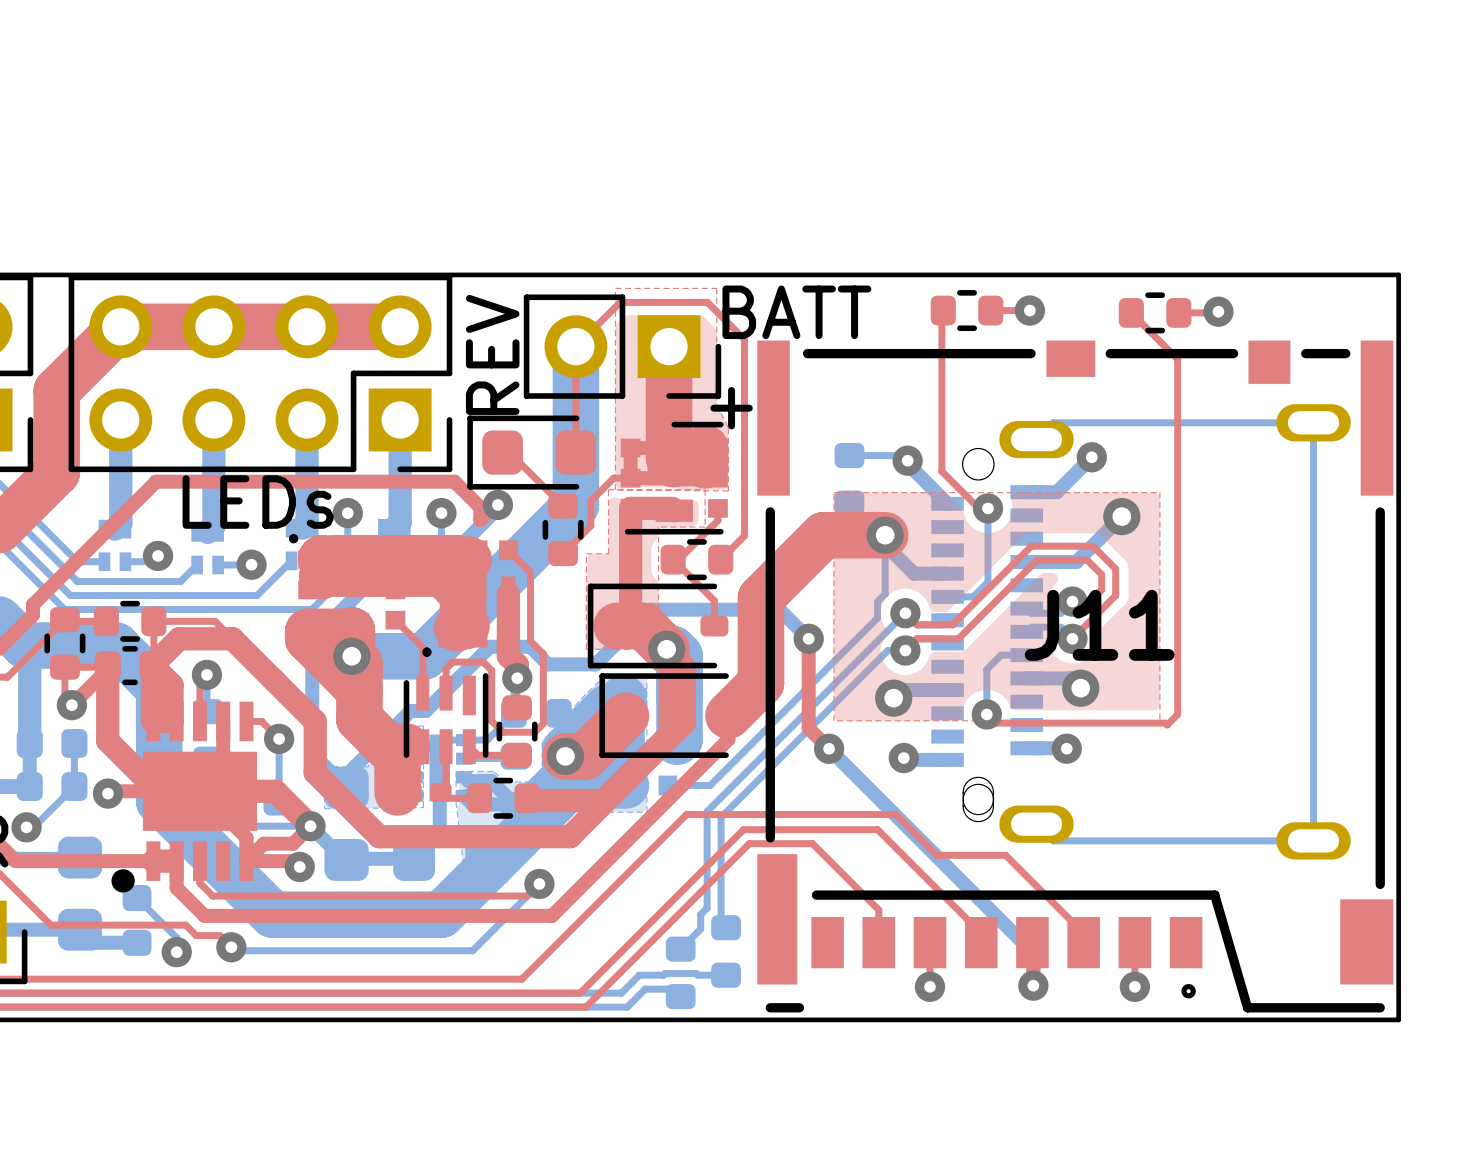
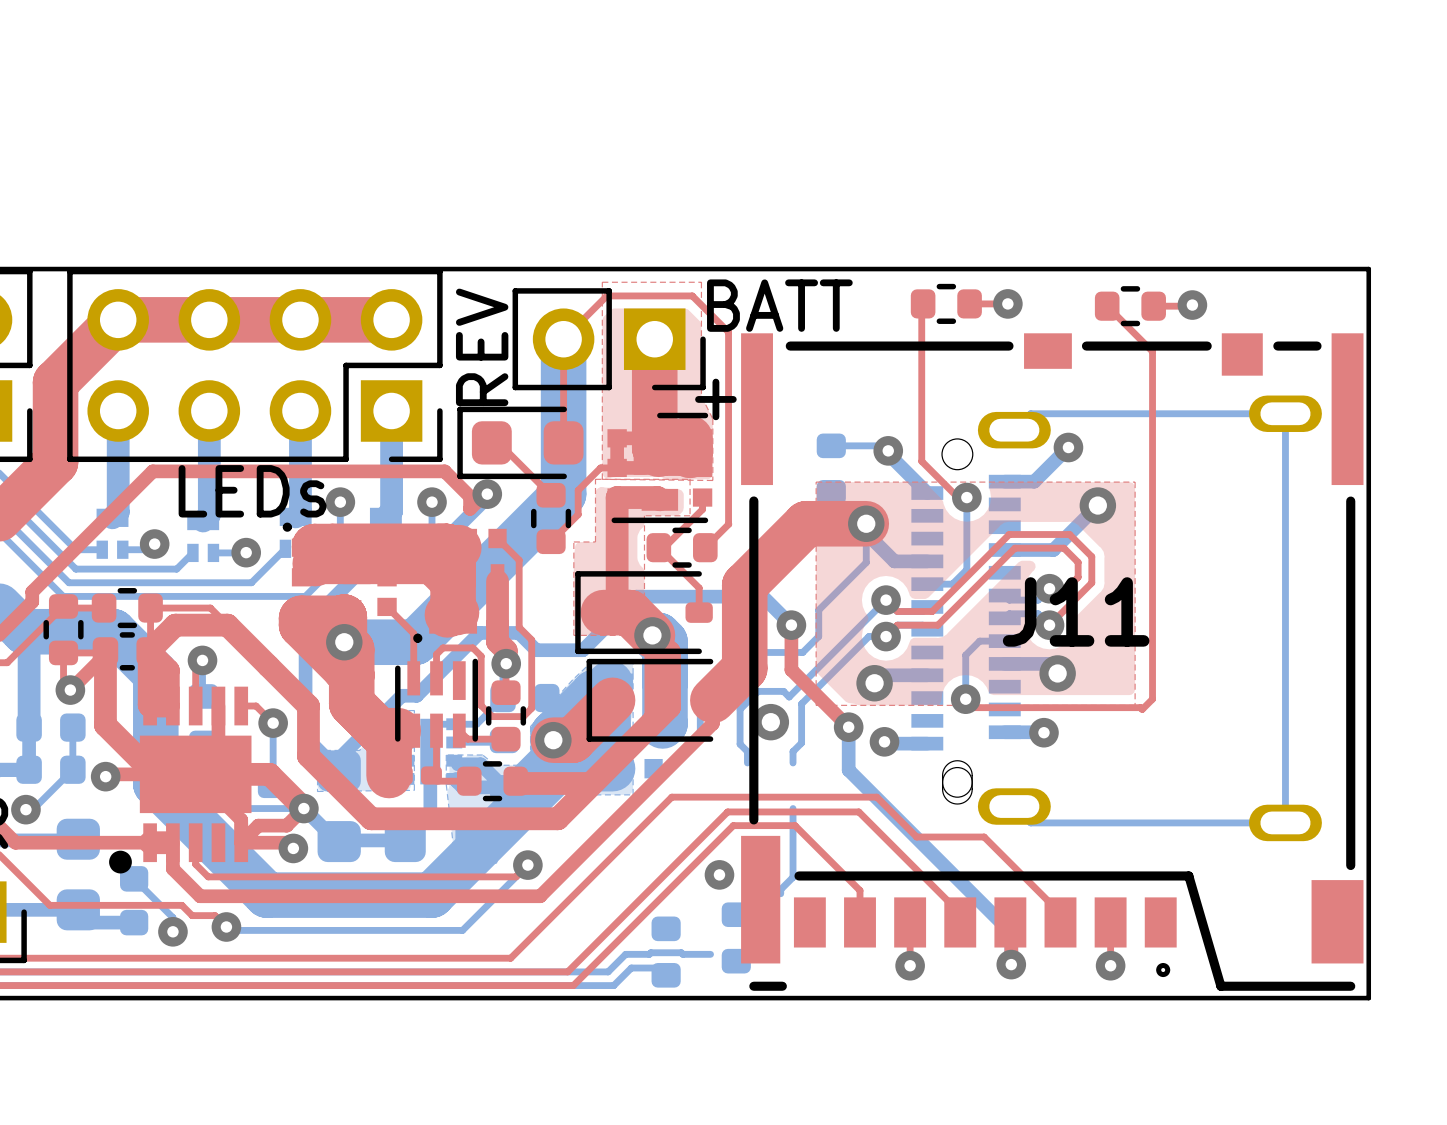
bottom track: (885, 574) (885, 593) (877, 601) (877, 618) (710, 785) (684, 785) -> (866, 562) (818, 610) (818, 636) (802, 652) (759, 652) (700, 711) (700, 738) (669, 768)
top track: (808, 684) (808, 728) (829, 748) -> (791, 669) (848, 727)
bottom track: (806, 712) (707, 811) (707, 908) (700, 914) (700, 929) (680, 949) -> (789, 696) (783, 691) (758, 691) (740, 709) (740, 744) (747, 751) (747, 762)
bottom track: (819, 719) (721, 817) (721, 922) -> (801, 703) (801, 743) (793, 751) (793, 762)
via: none -> (770, 722)
bottom track: (829, 748) (867, 786) -> (848, 727) (848, 770)
via position: (829, 748) -> (848, 727)
bottom track: none -> (793, 808) (793, 877) (780, 889) (780, 893)
via: none -> (719, 874)
part position: (726, 951) -> (736, 937)

